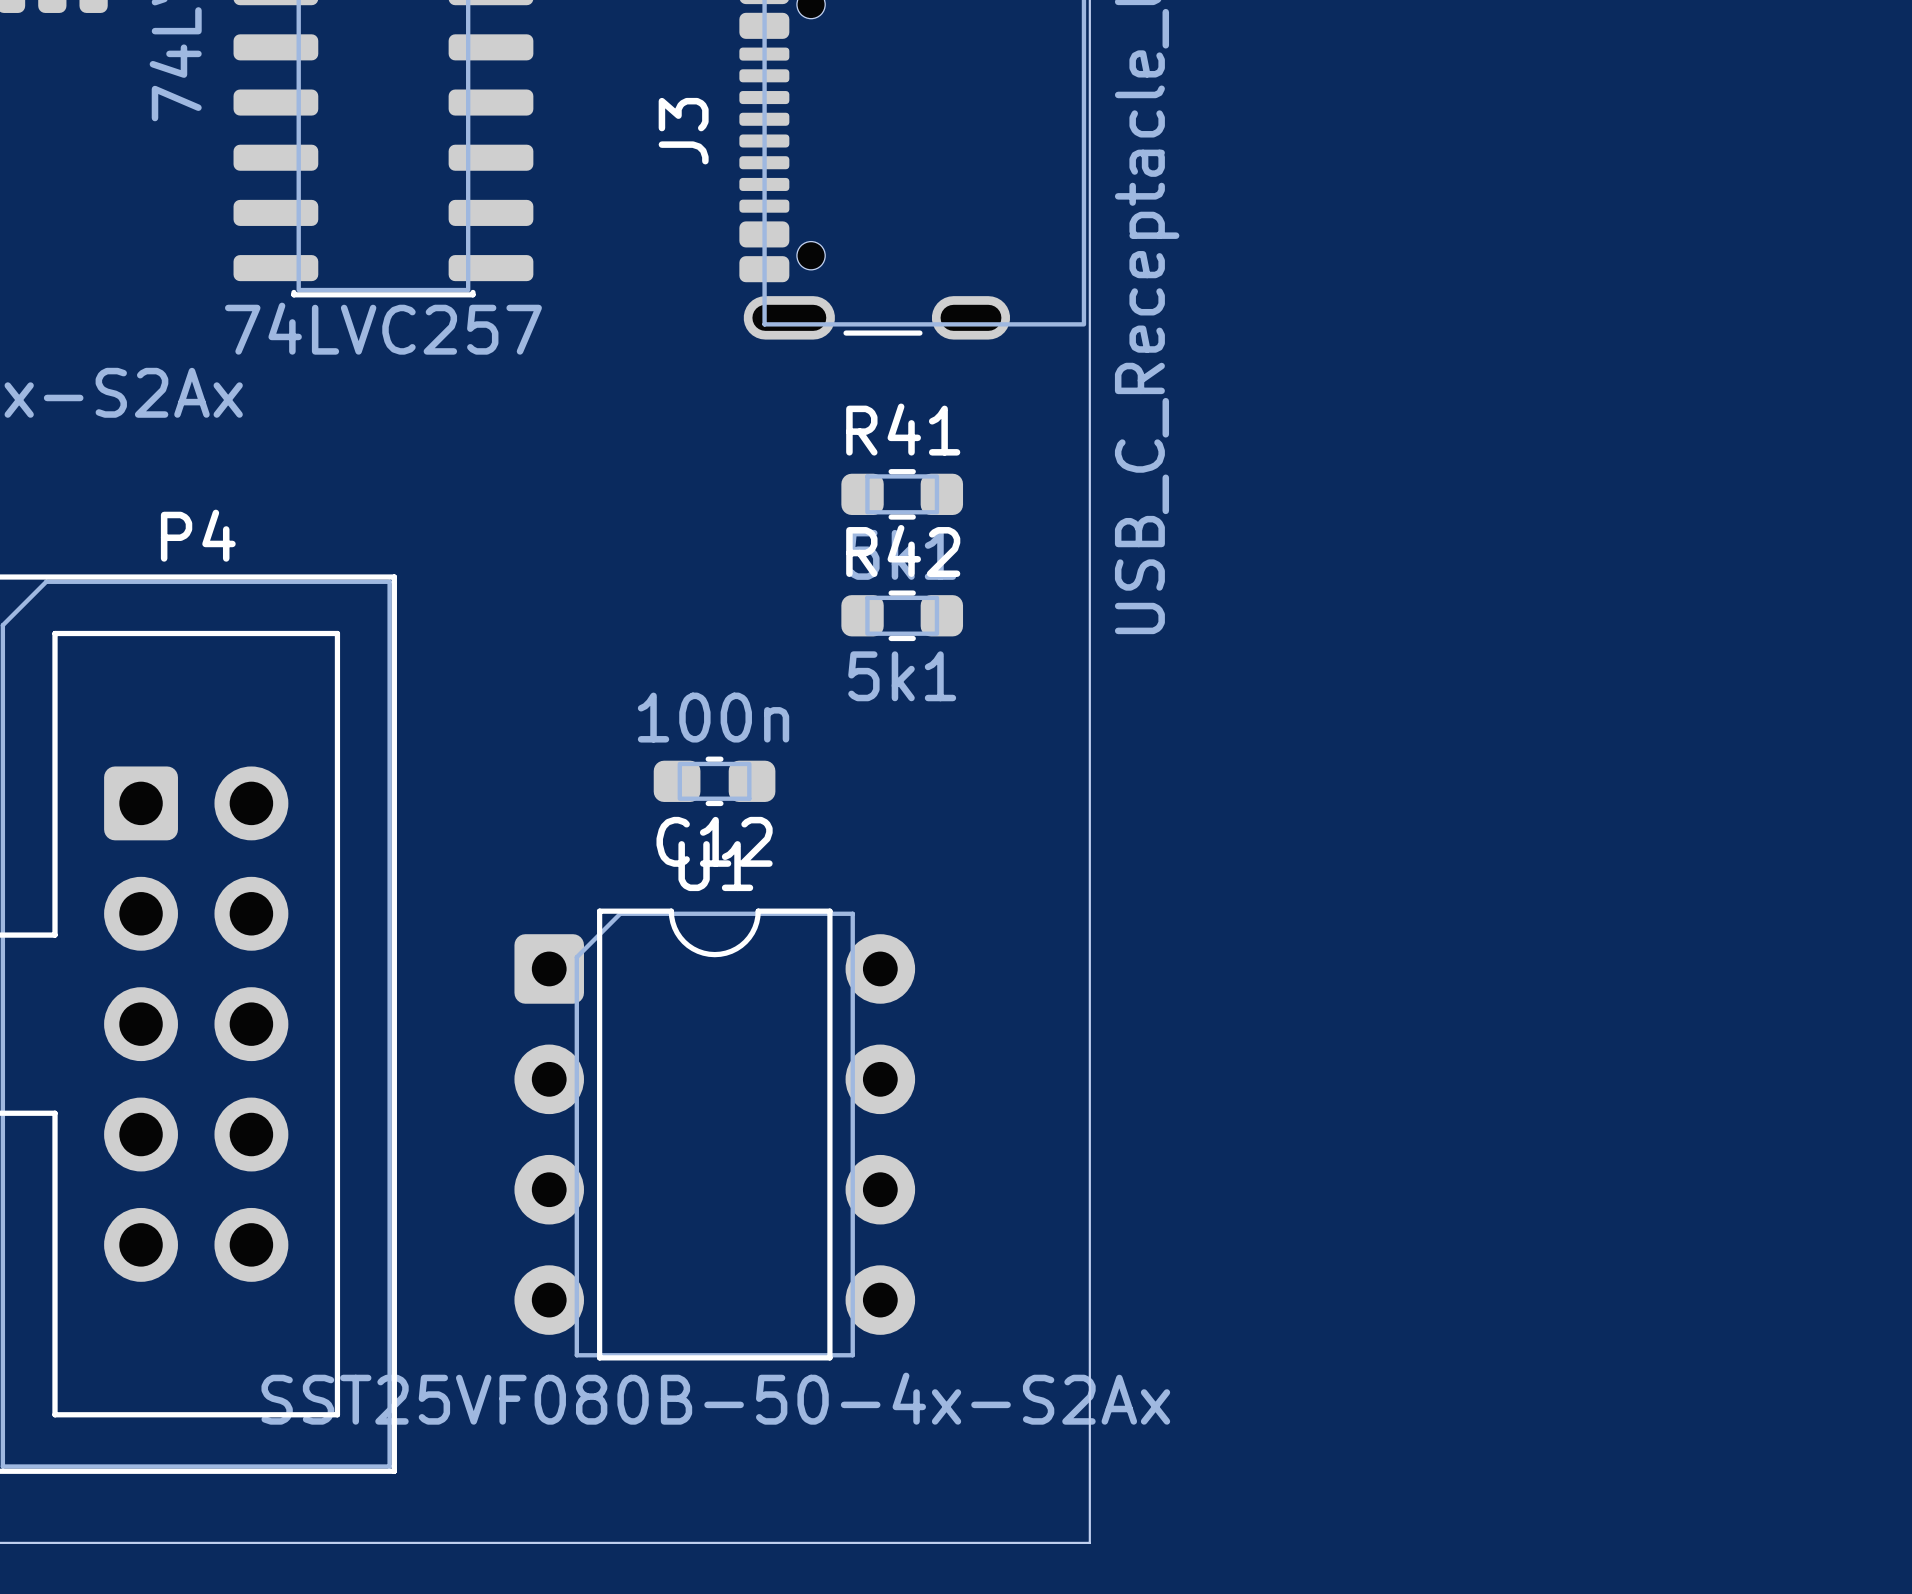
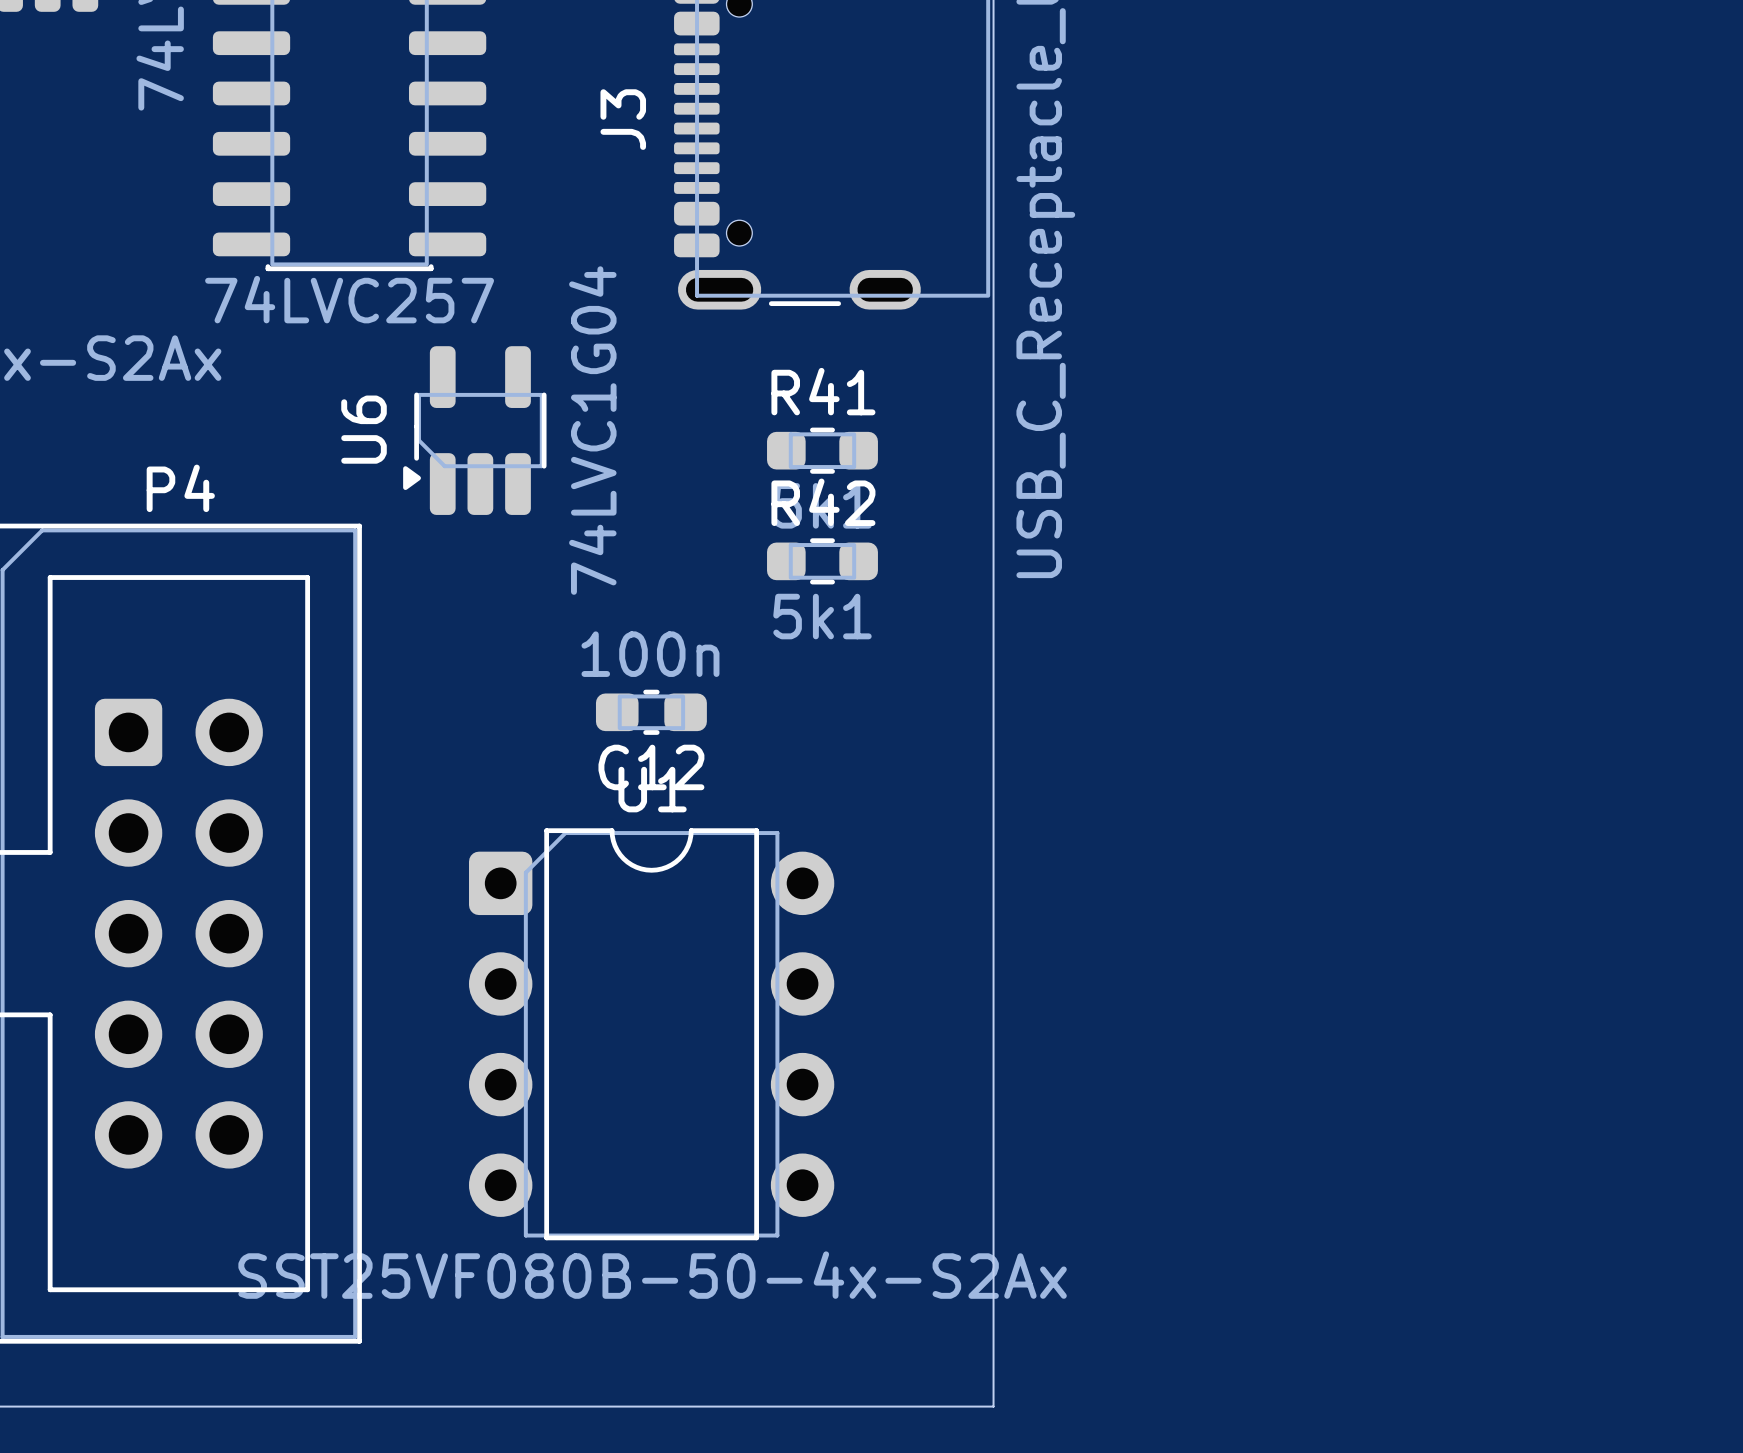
U6: none -> 74LVC1G04 (474, 430)

